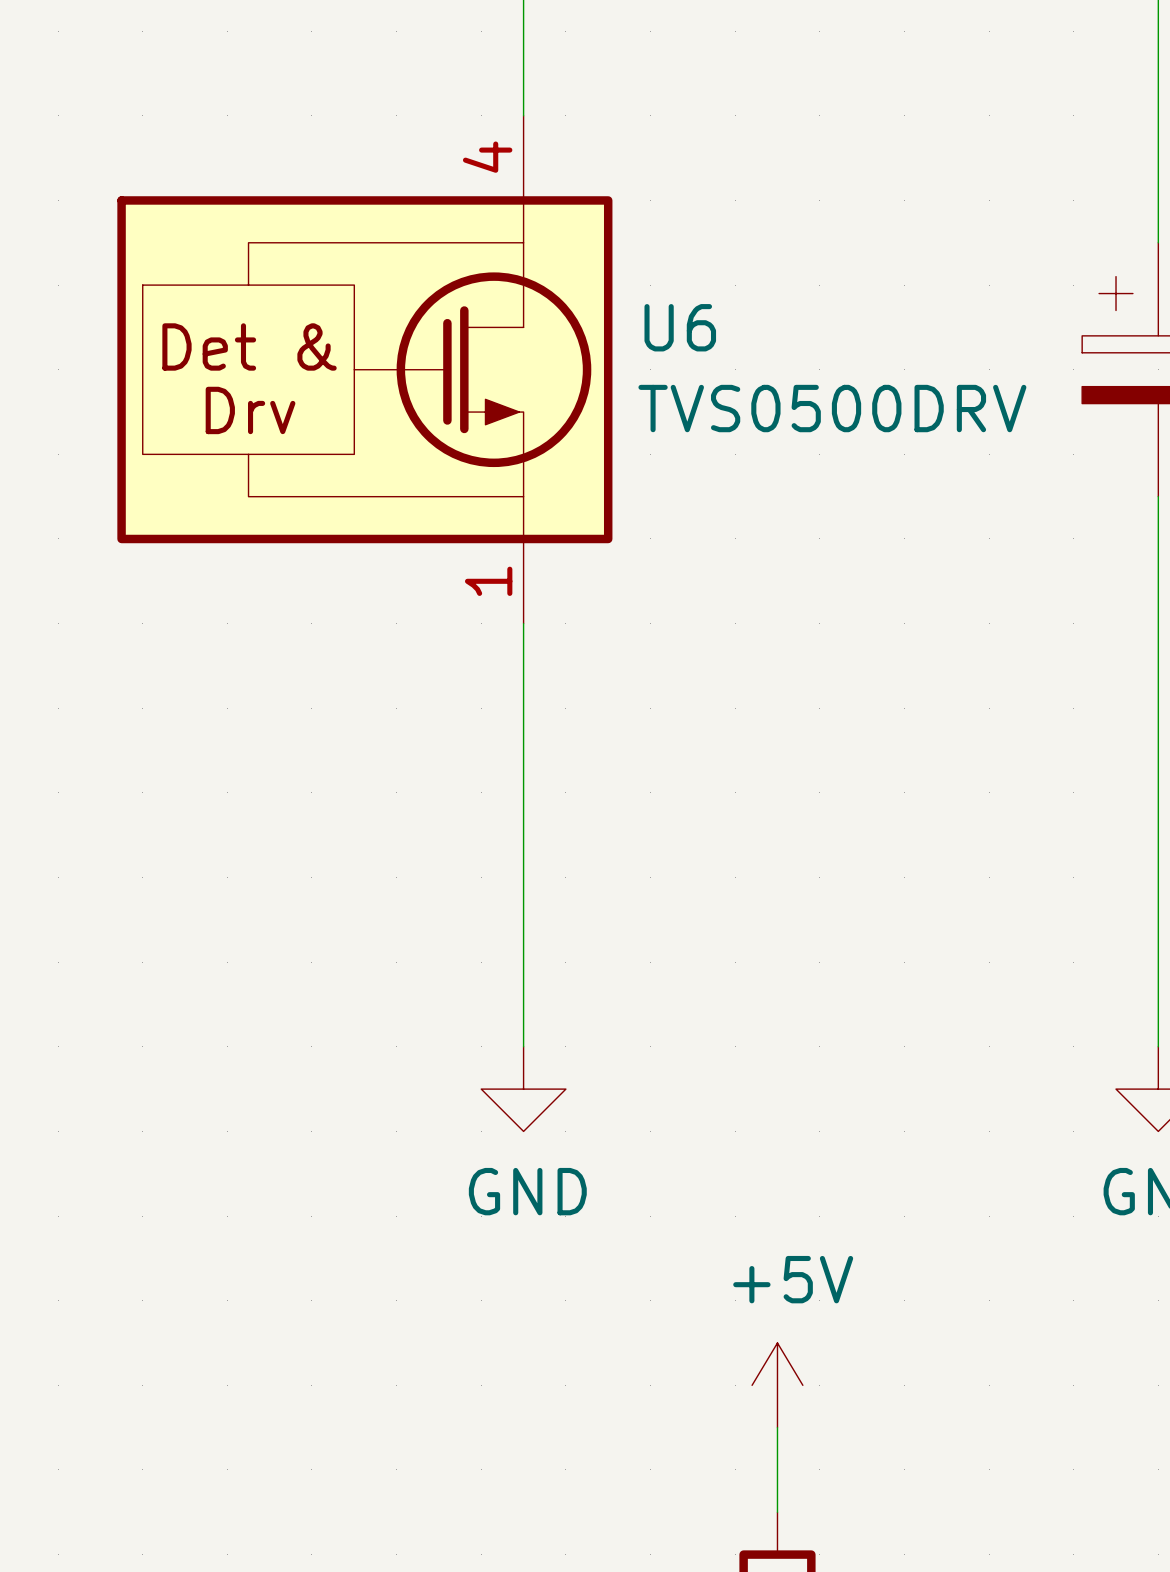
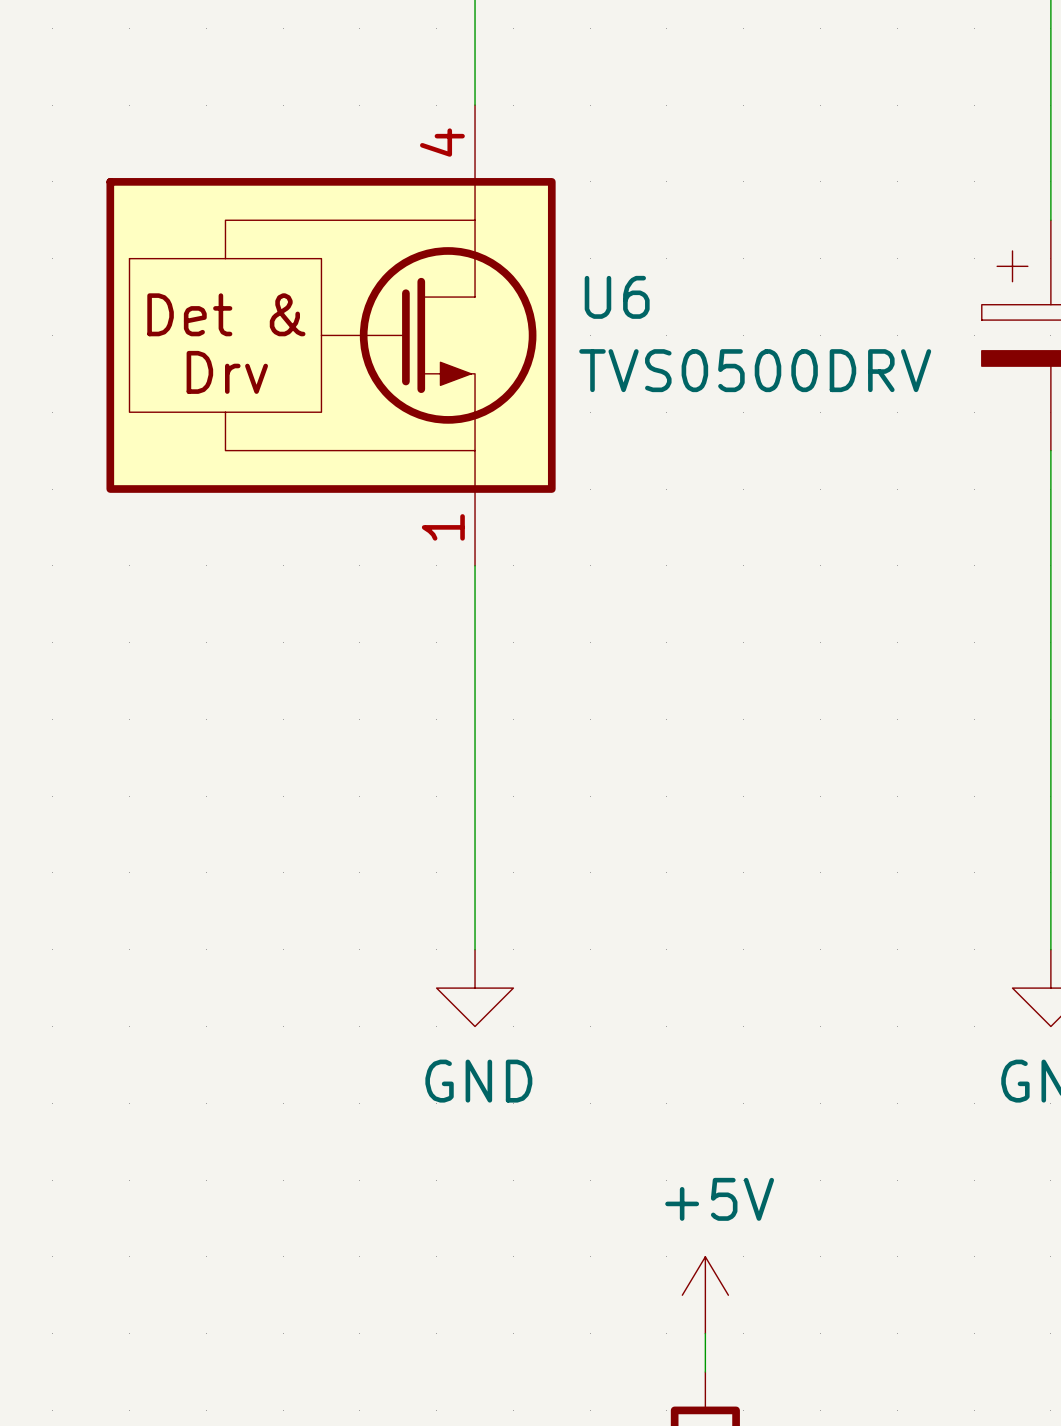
power symbol position: +5V (777, 1385) -> +5V (705, 1295)

